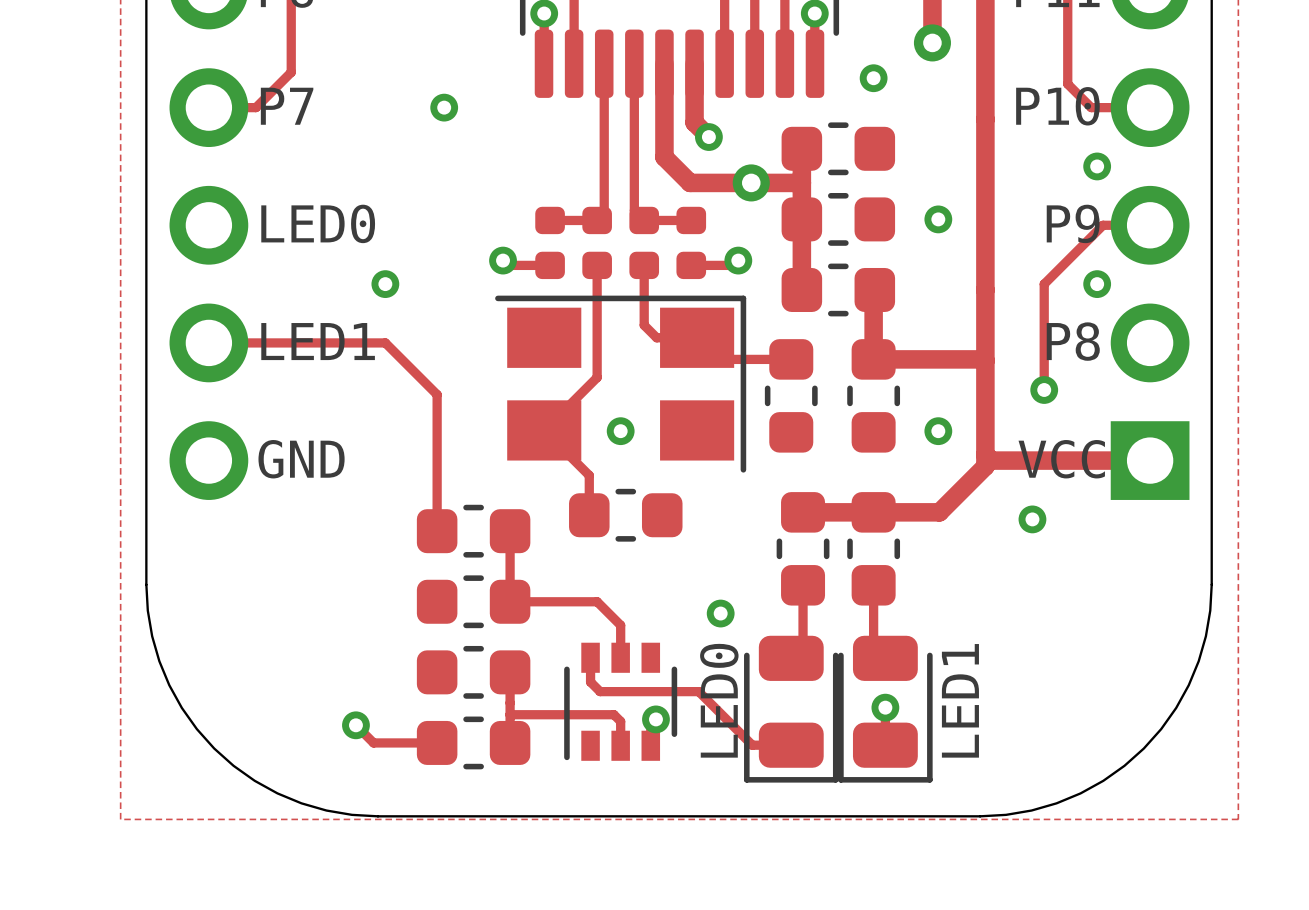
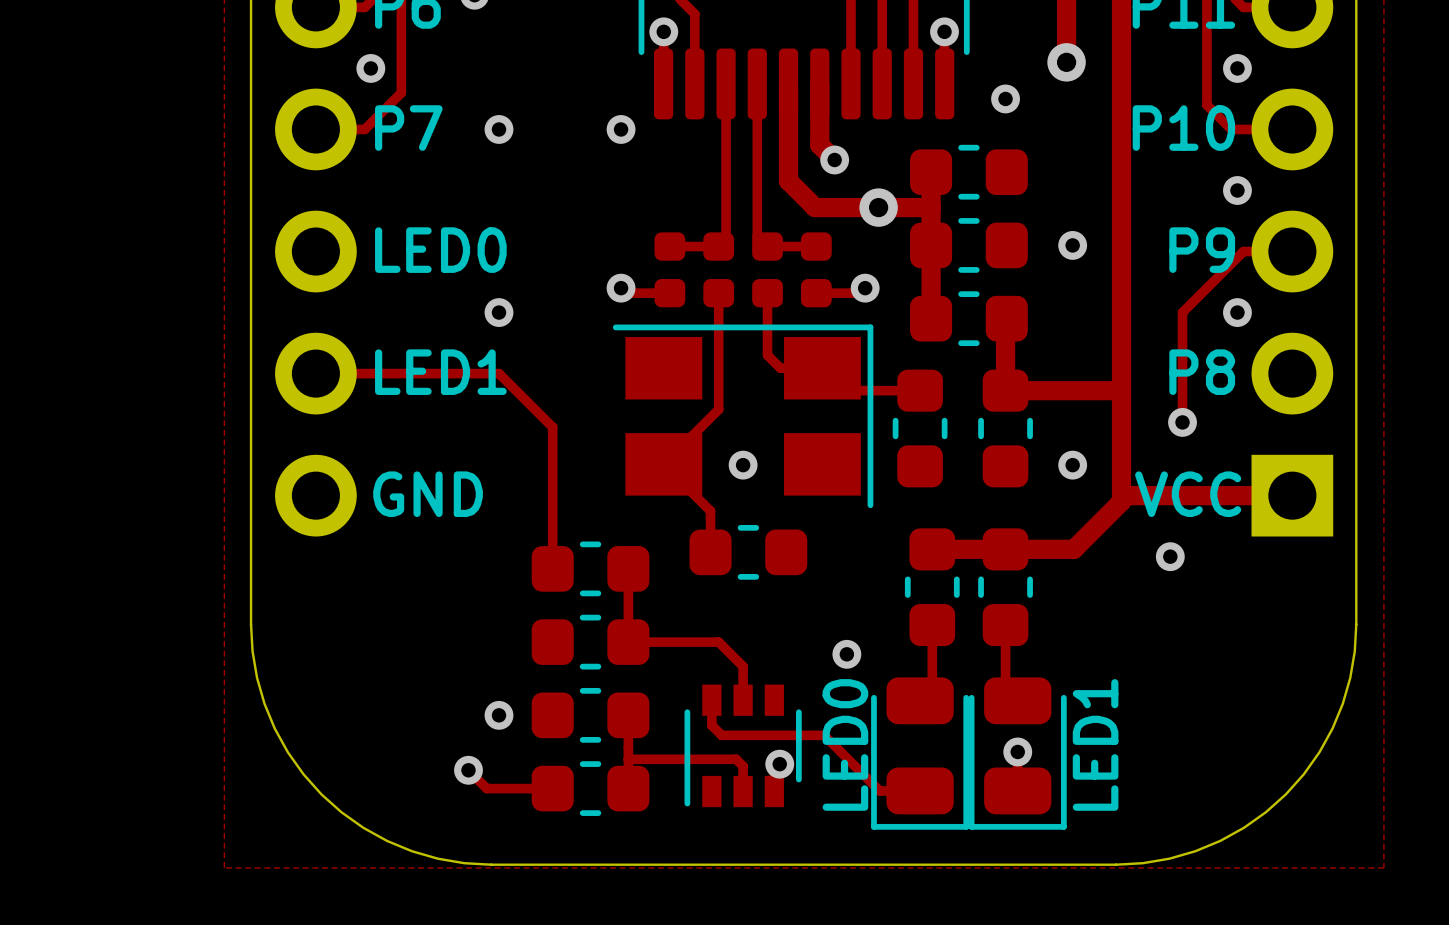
via: none -> (370, 68)
via: none -> (1237, 68)
via: none -> (499, 129)
via: (444, 107) -> none
via: none -> (621, 129)
via: none -> (499, 715)

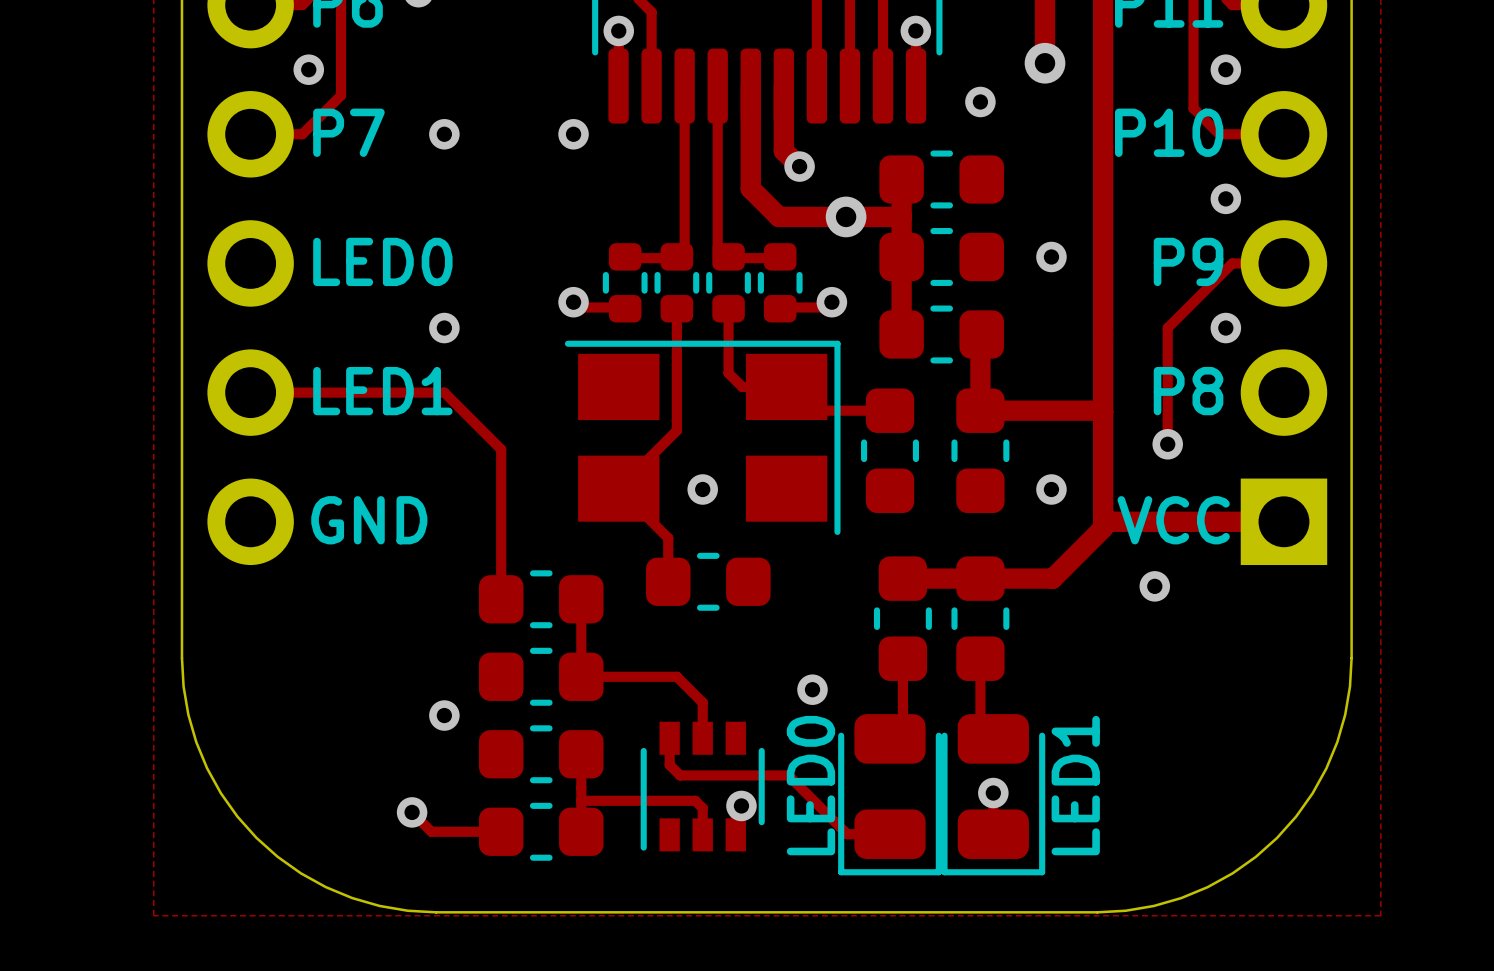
part footprint: [654, 232, 686, 308] -> [602, 243, 648, 323]
part footprint: [703, 232, 735, 308] -> [654, 243, 700, 323]
part footprint: [752, 232, 783, 308] -> [706, 243, 751, 323]
part footprint: [800, 232, 832, 308] -> [757, 243, 803, 323]
via position: (499, 715) -> (444, 715)

